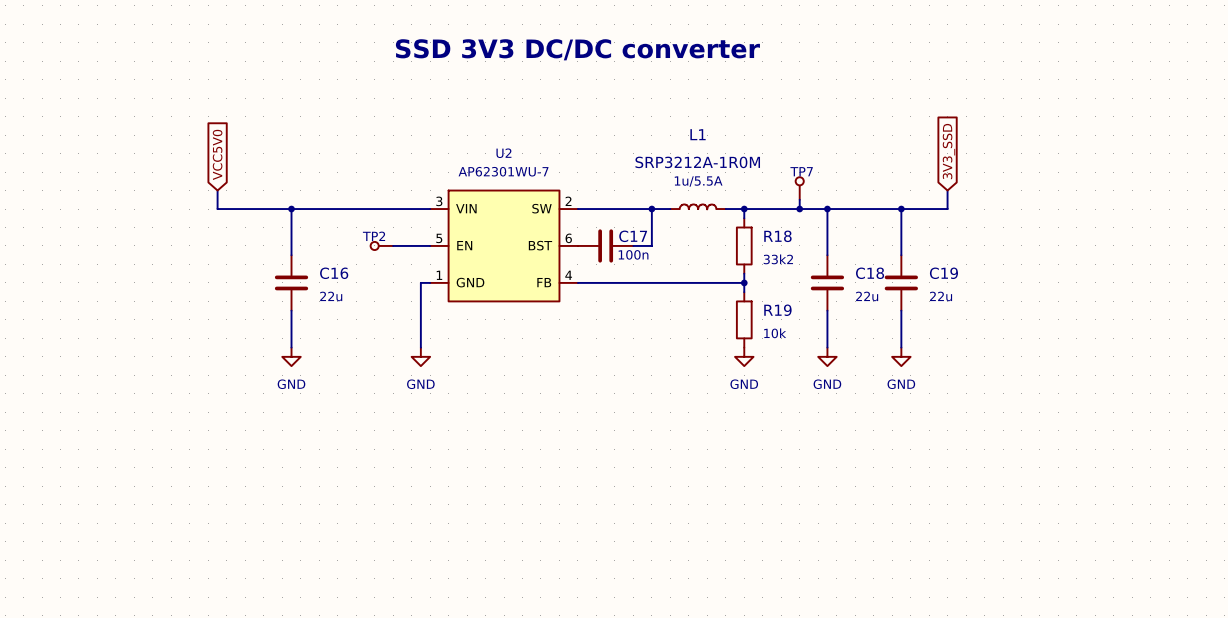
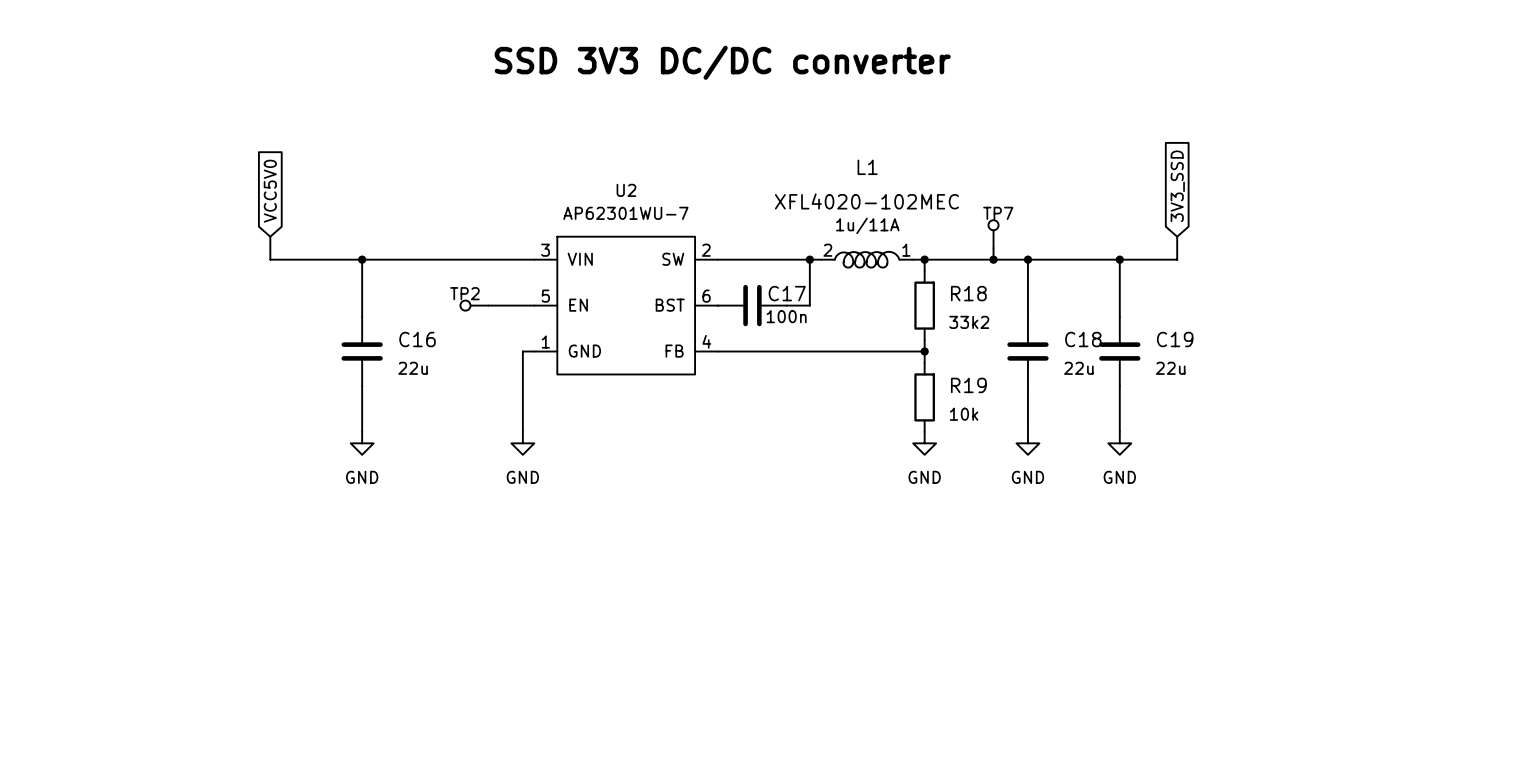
L1 value: SRP3212A-1R0M (697, 162) -> XFL4020-102MEC (866, 201)
L1 text: 1u/5.5A (698, 181) -> 1u/11A (867, 225)
L1 symbol: [670, 203, 726, 211] -> [821, 251, 914, 268]

